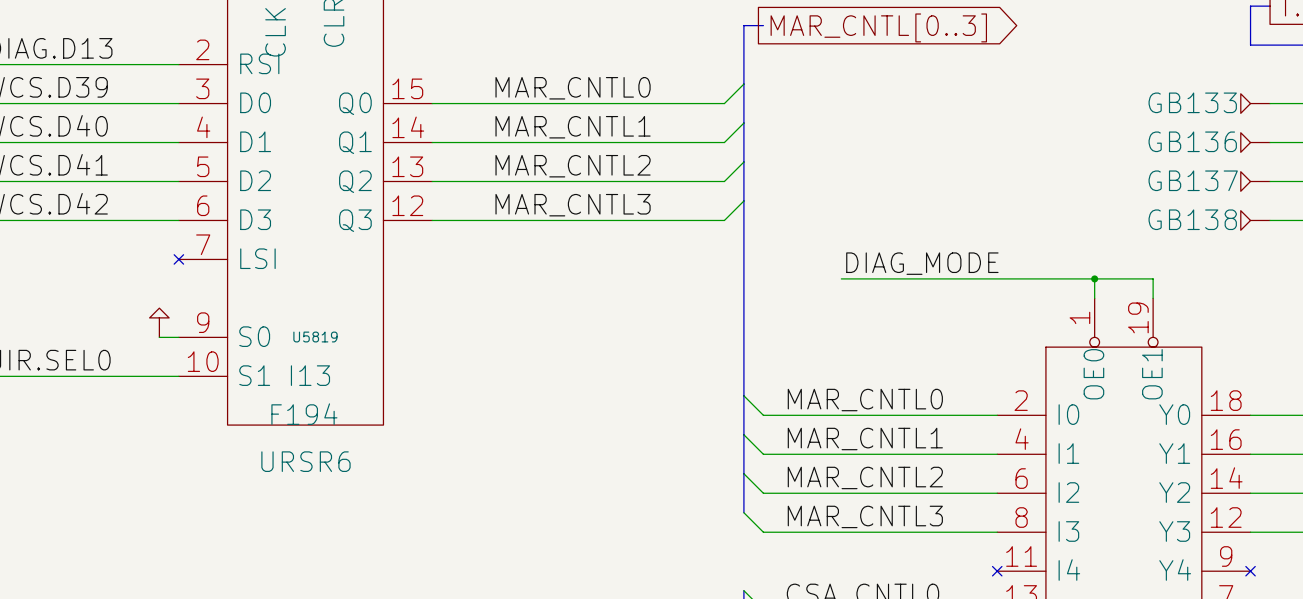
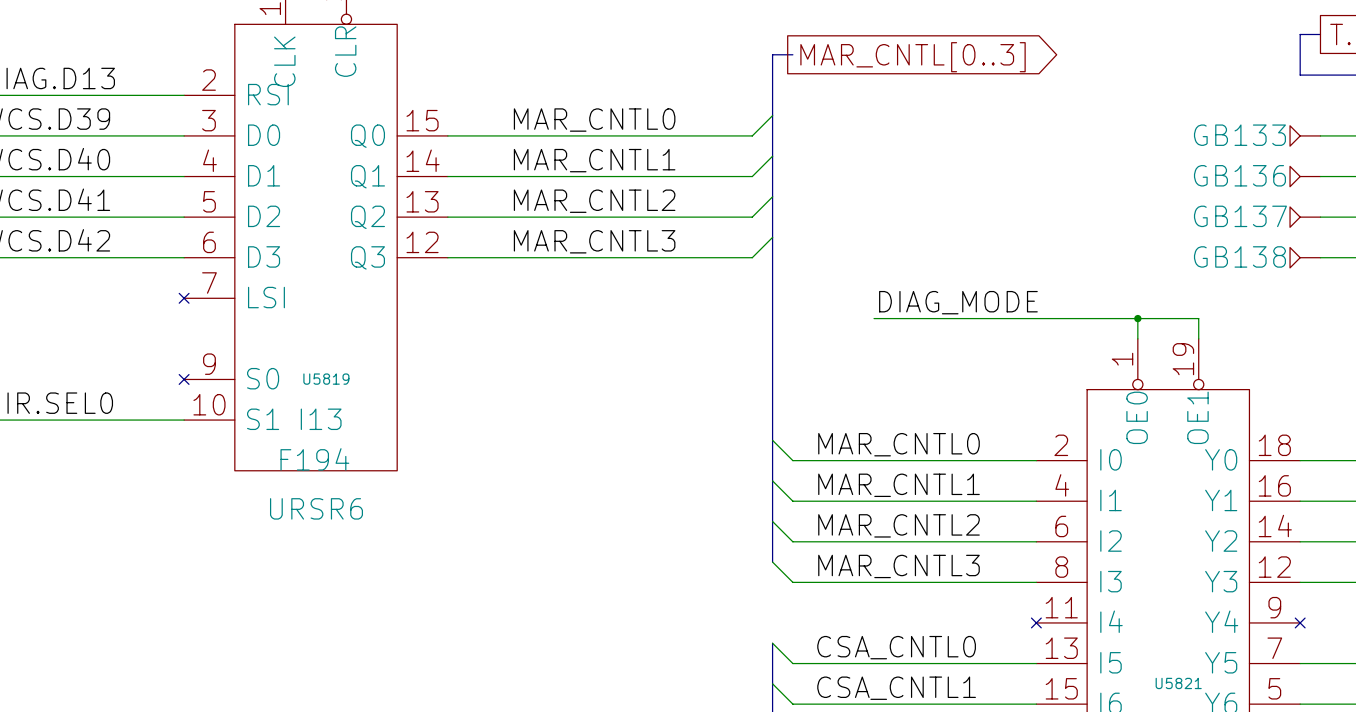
power symbol: (159, 322) -> none
wire: (159, 337) (178, 337) -> none
no-connect mark: none -> (184, 379)

